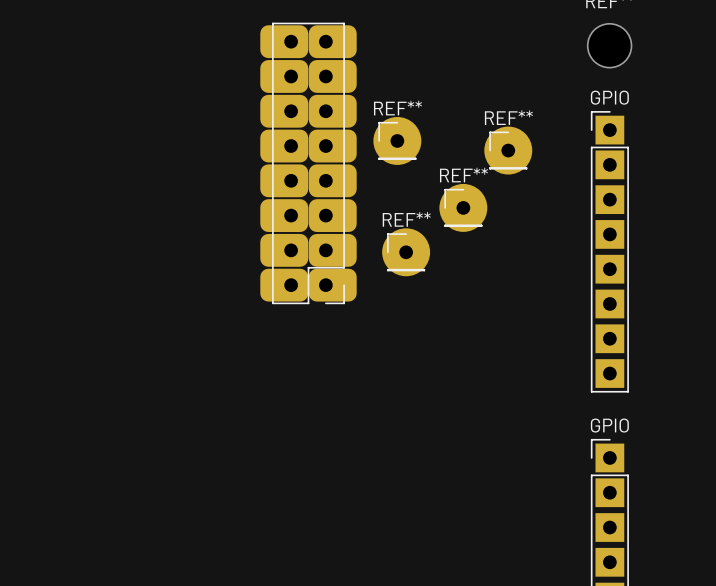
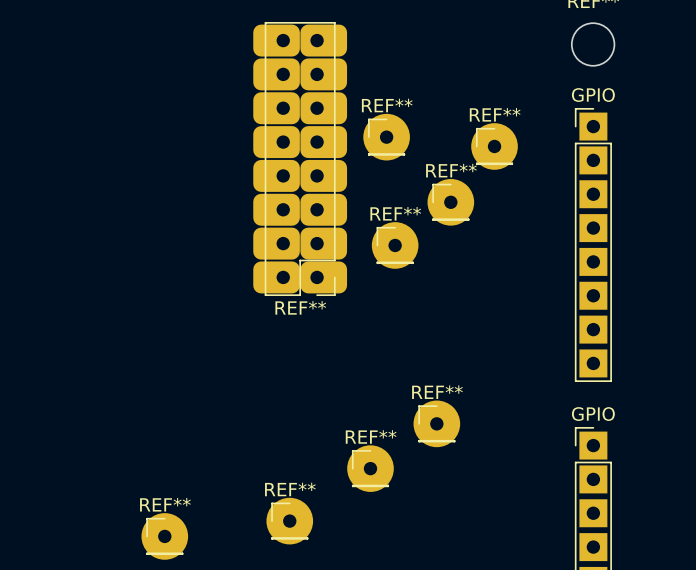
REF** name: none -> REF** (300, 307)
REF**: none -> (436, 423)
REF**: none -> (370, 468)
REF**: none -> (289, 521)
REF**: none -> (164, 536)

